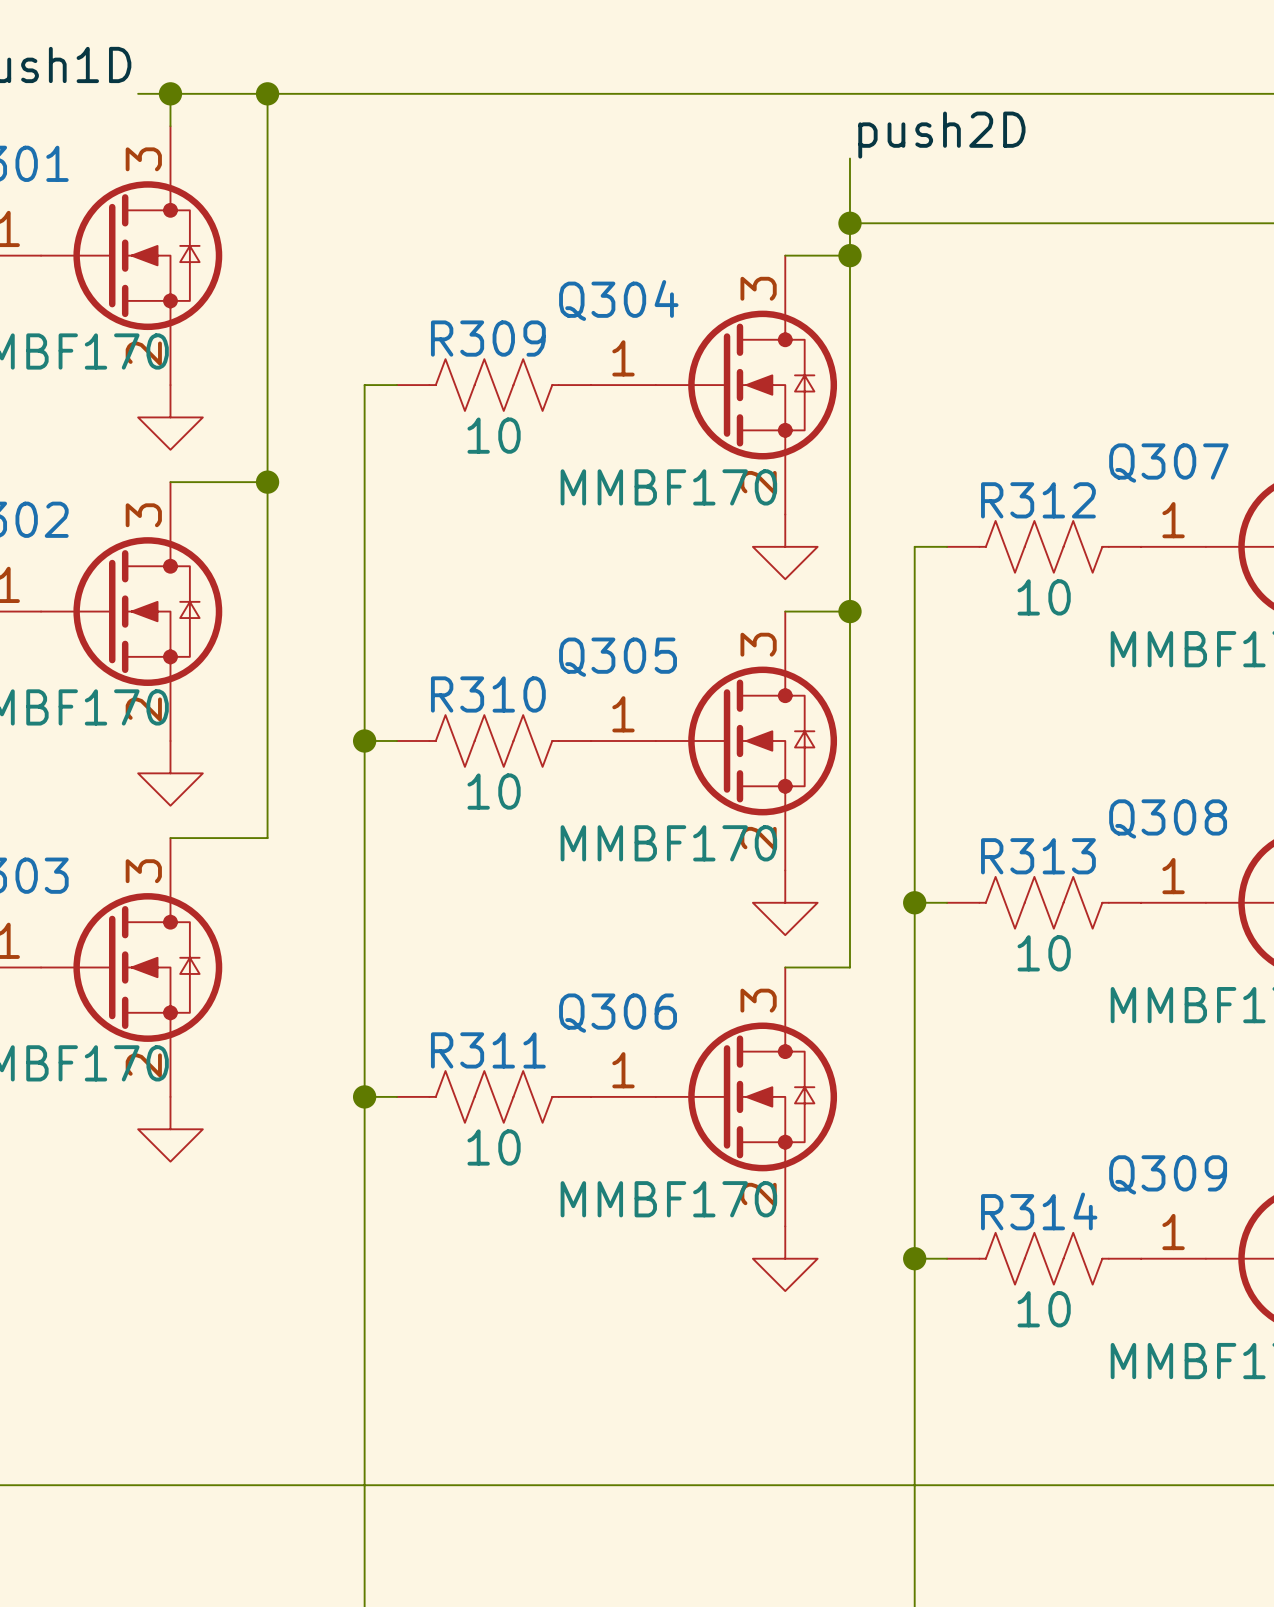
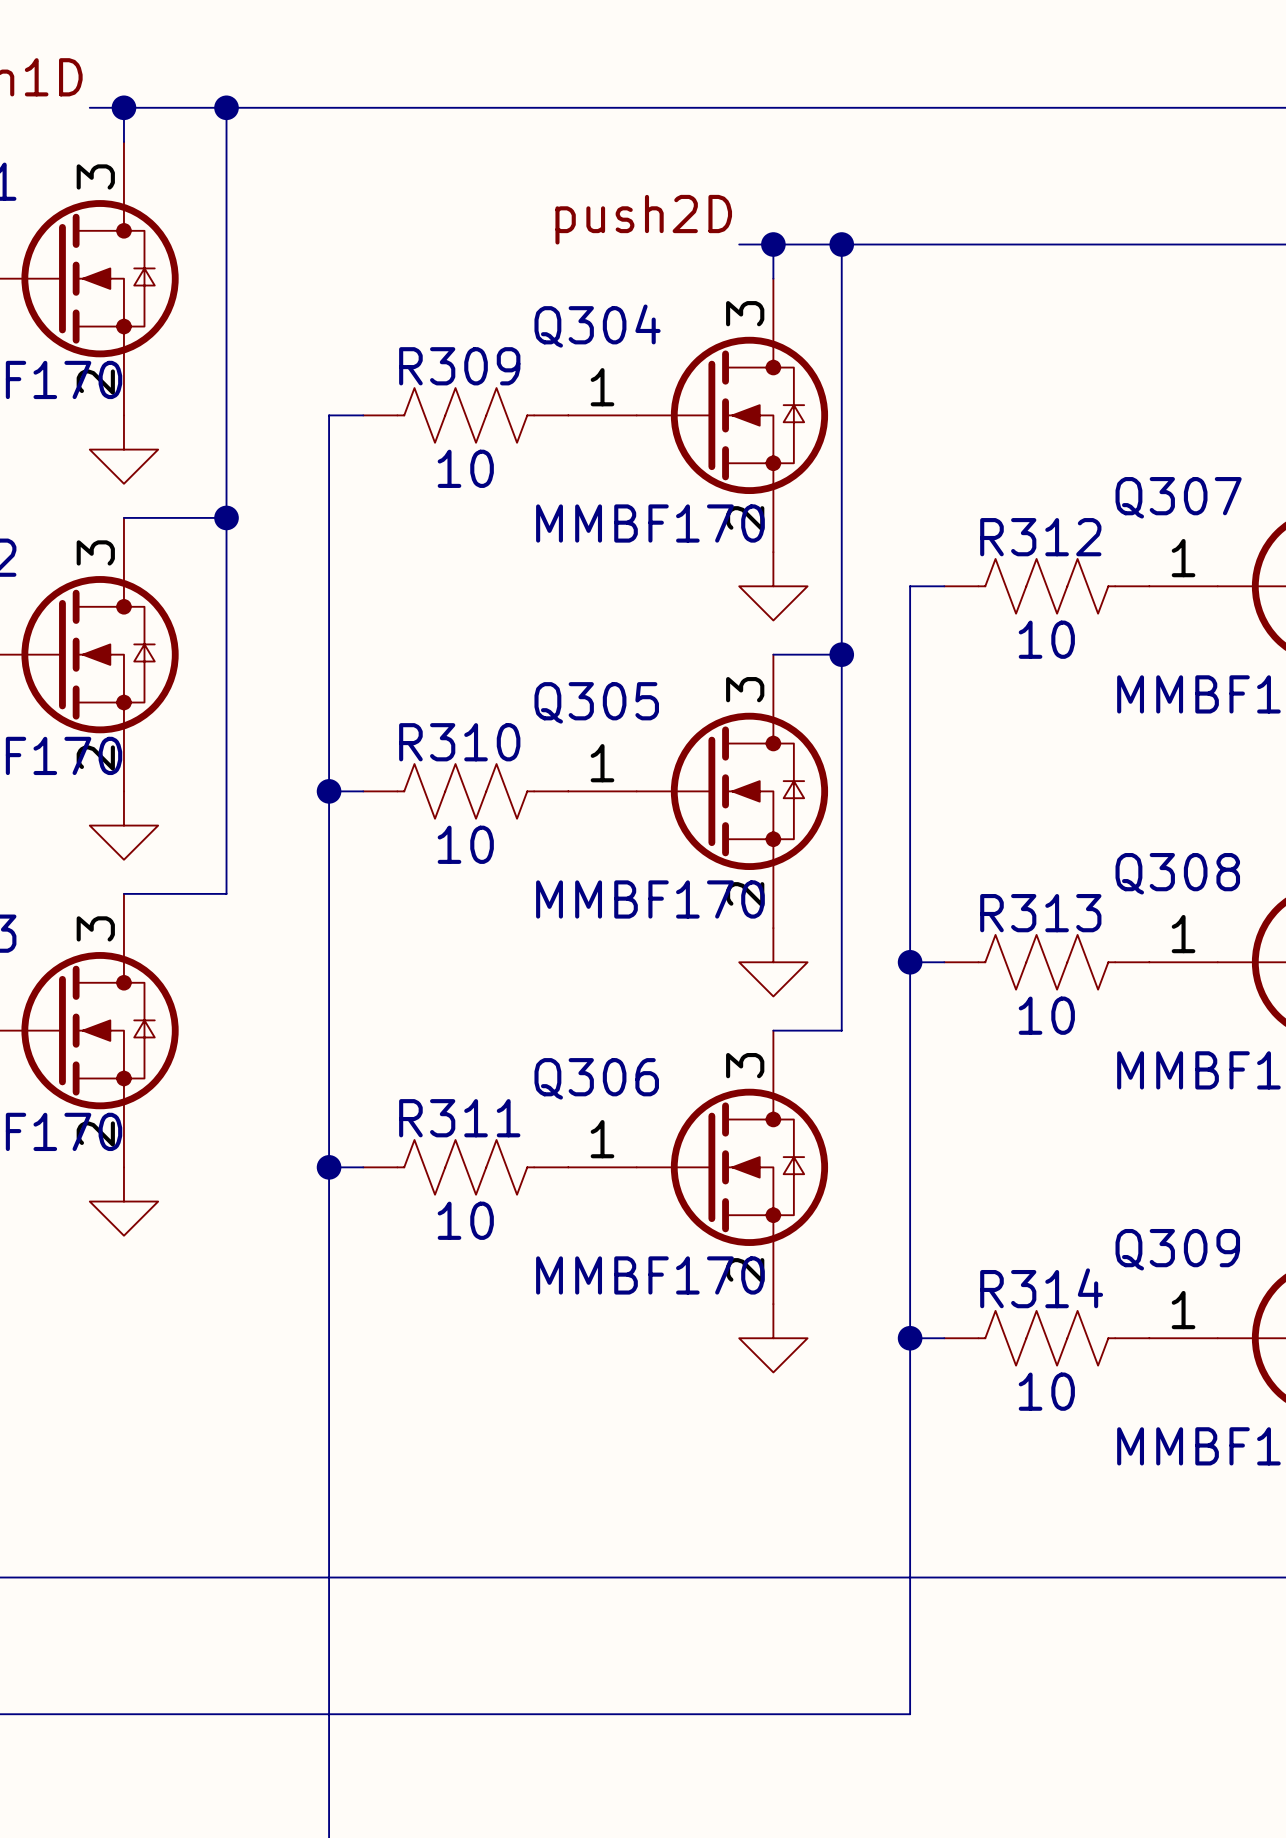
label position: push2D (941, 135) -> push2D (643, 219)
wire: (849, 158) (849, 223) -> (739, 244) (841, 244)
wire: (785, 255) (849, 255) -> (773, 278) (773, 244)
junction position: (849, 255) -> (773, 244)

